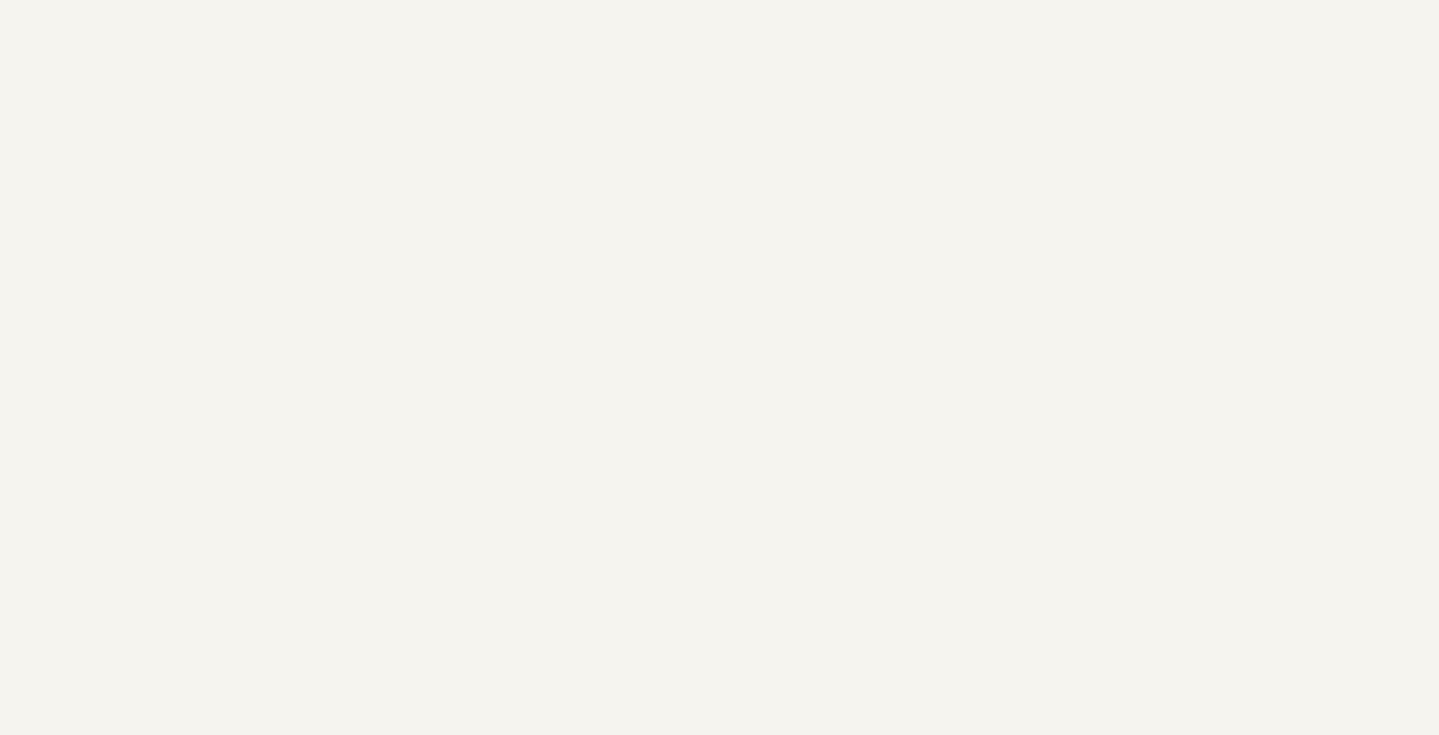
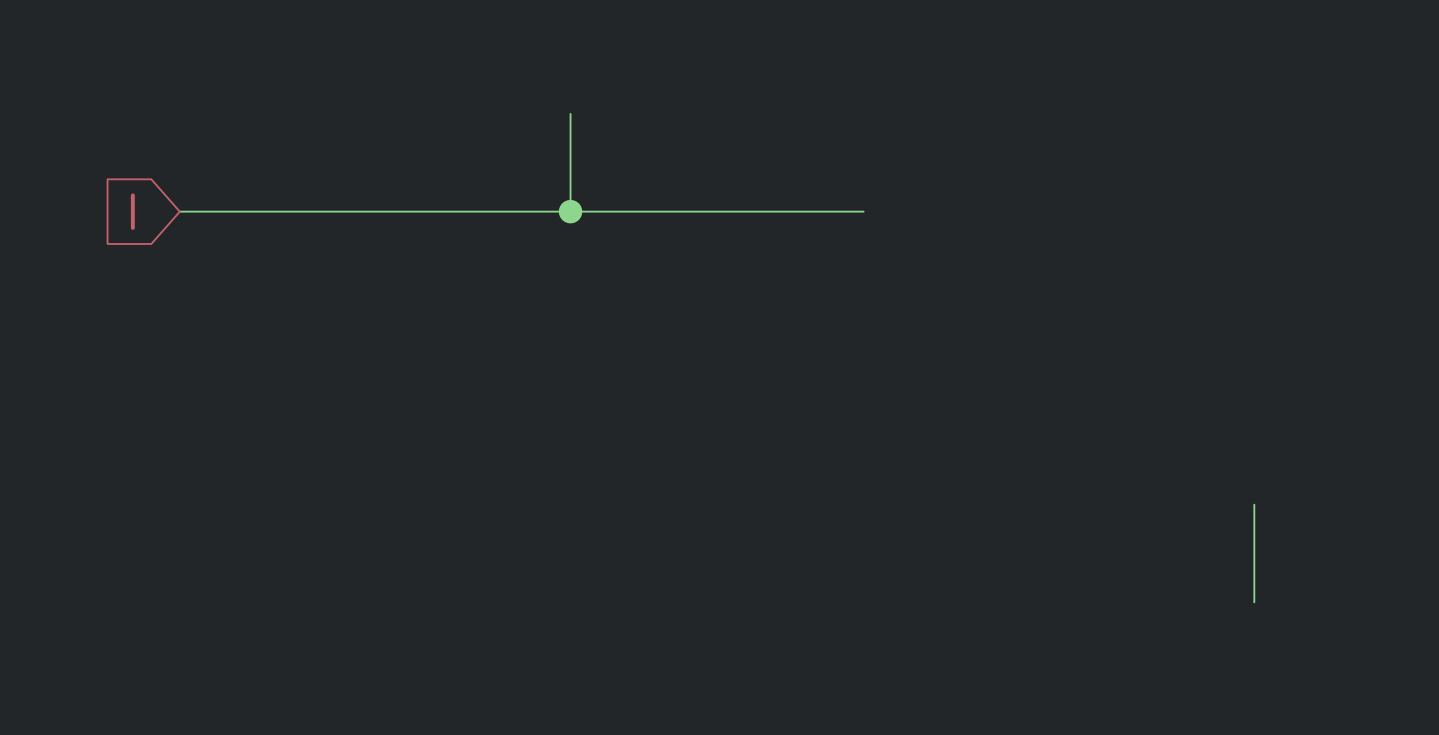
wire: none -> (570, 113) (570, 211)
global label: none -> I (132, 211)
wire: none -> (179, 211) (863, 211)
junction: none -> (570, 211)
wire: none -> (1254, 504) (1254, 602)

